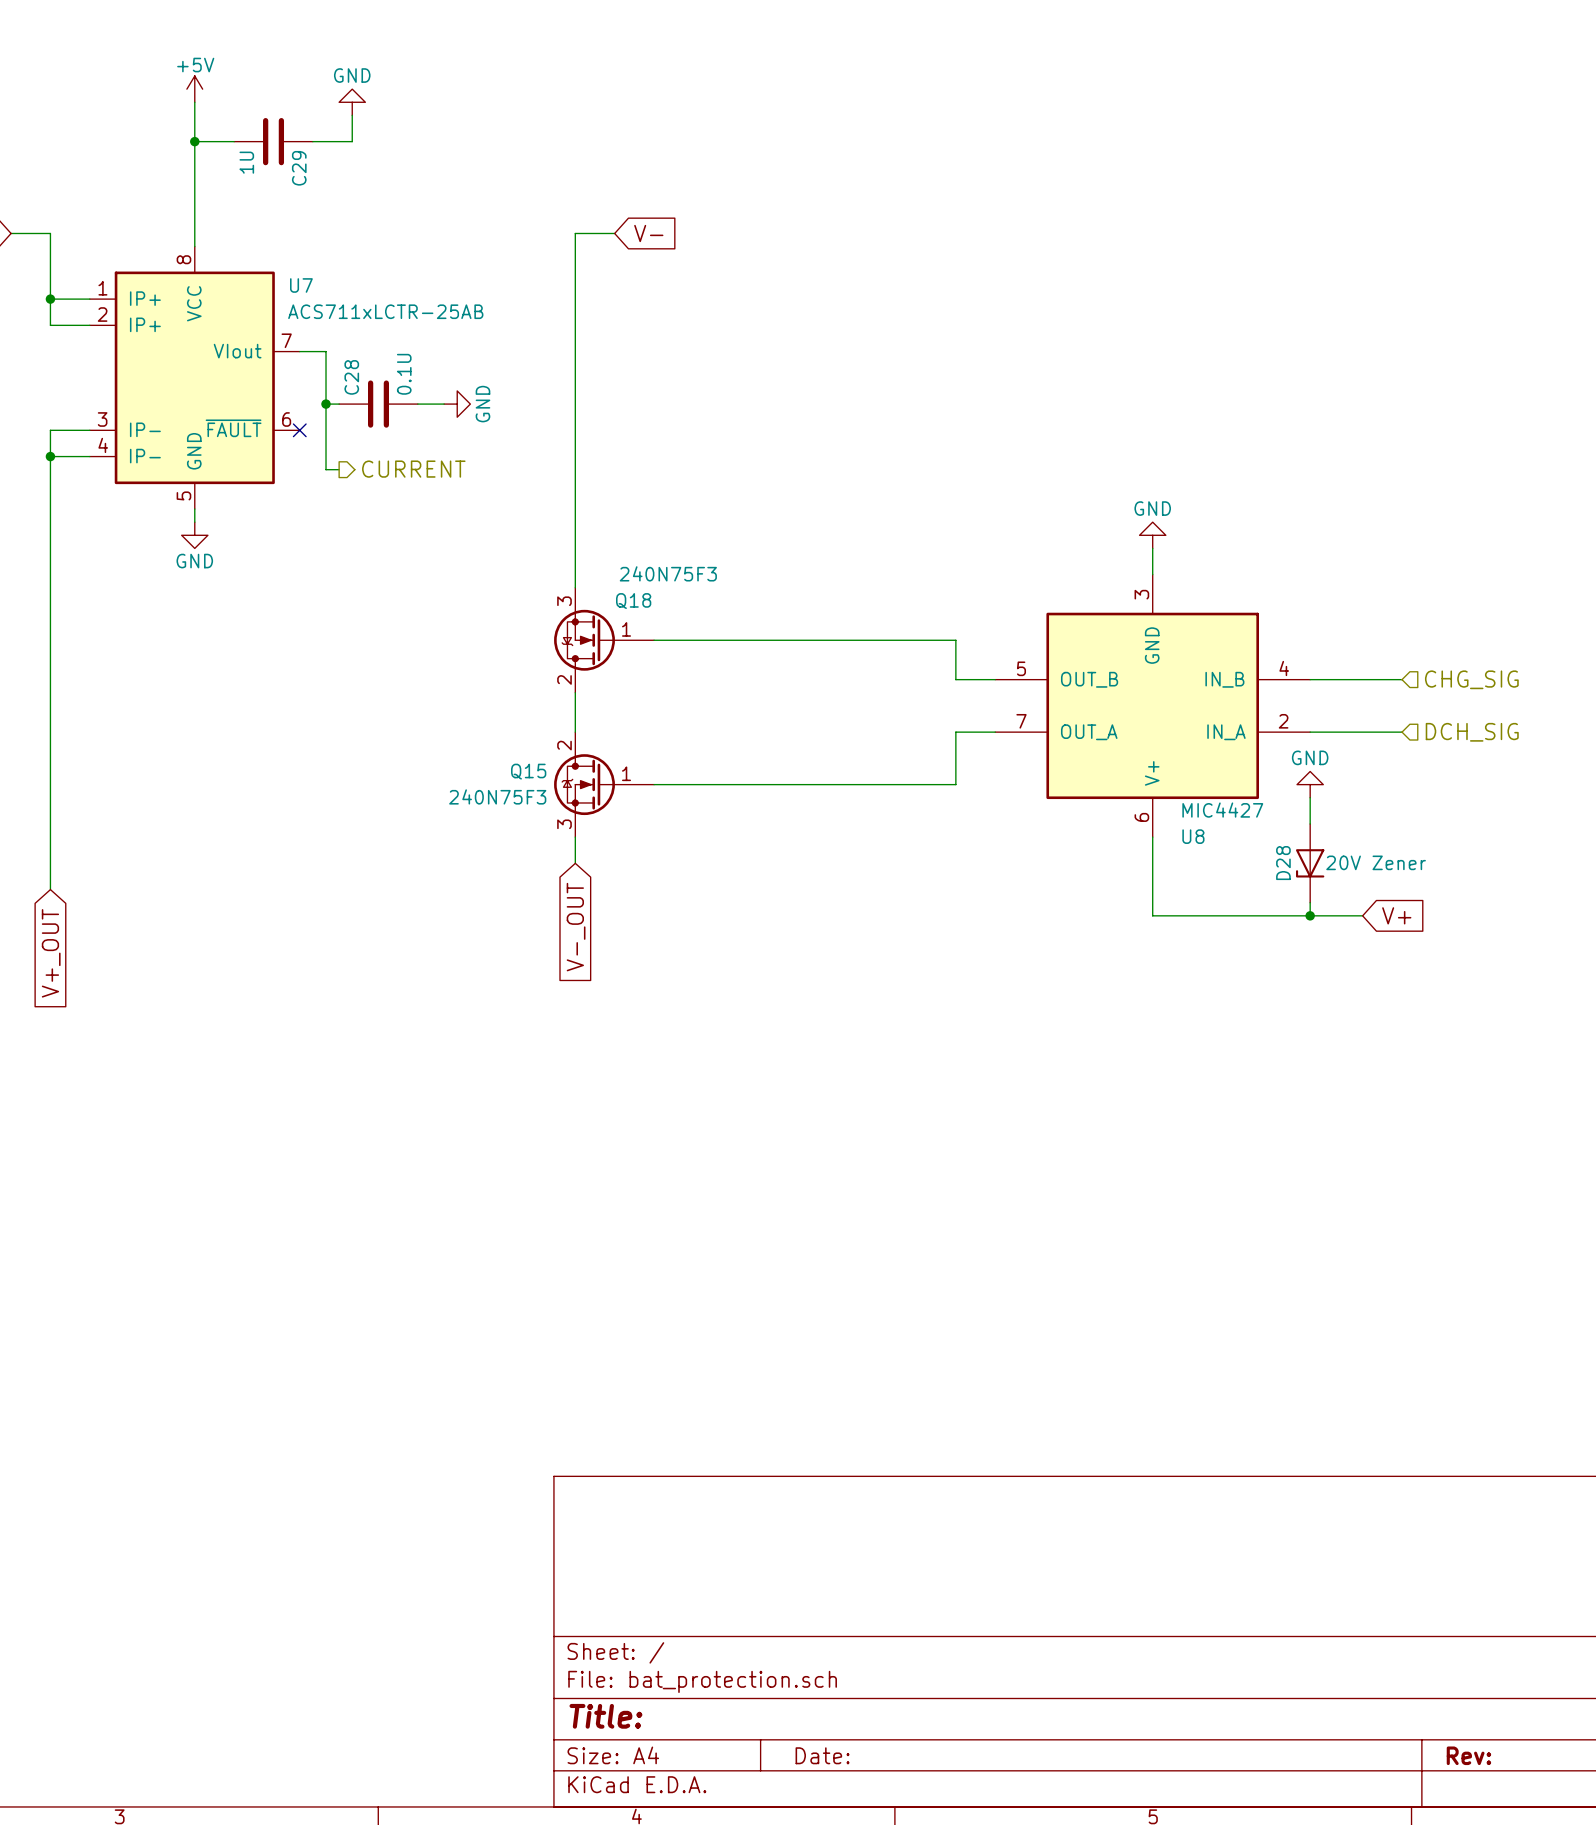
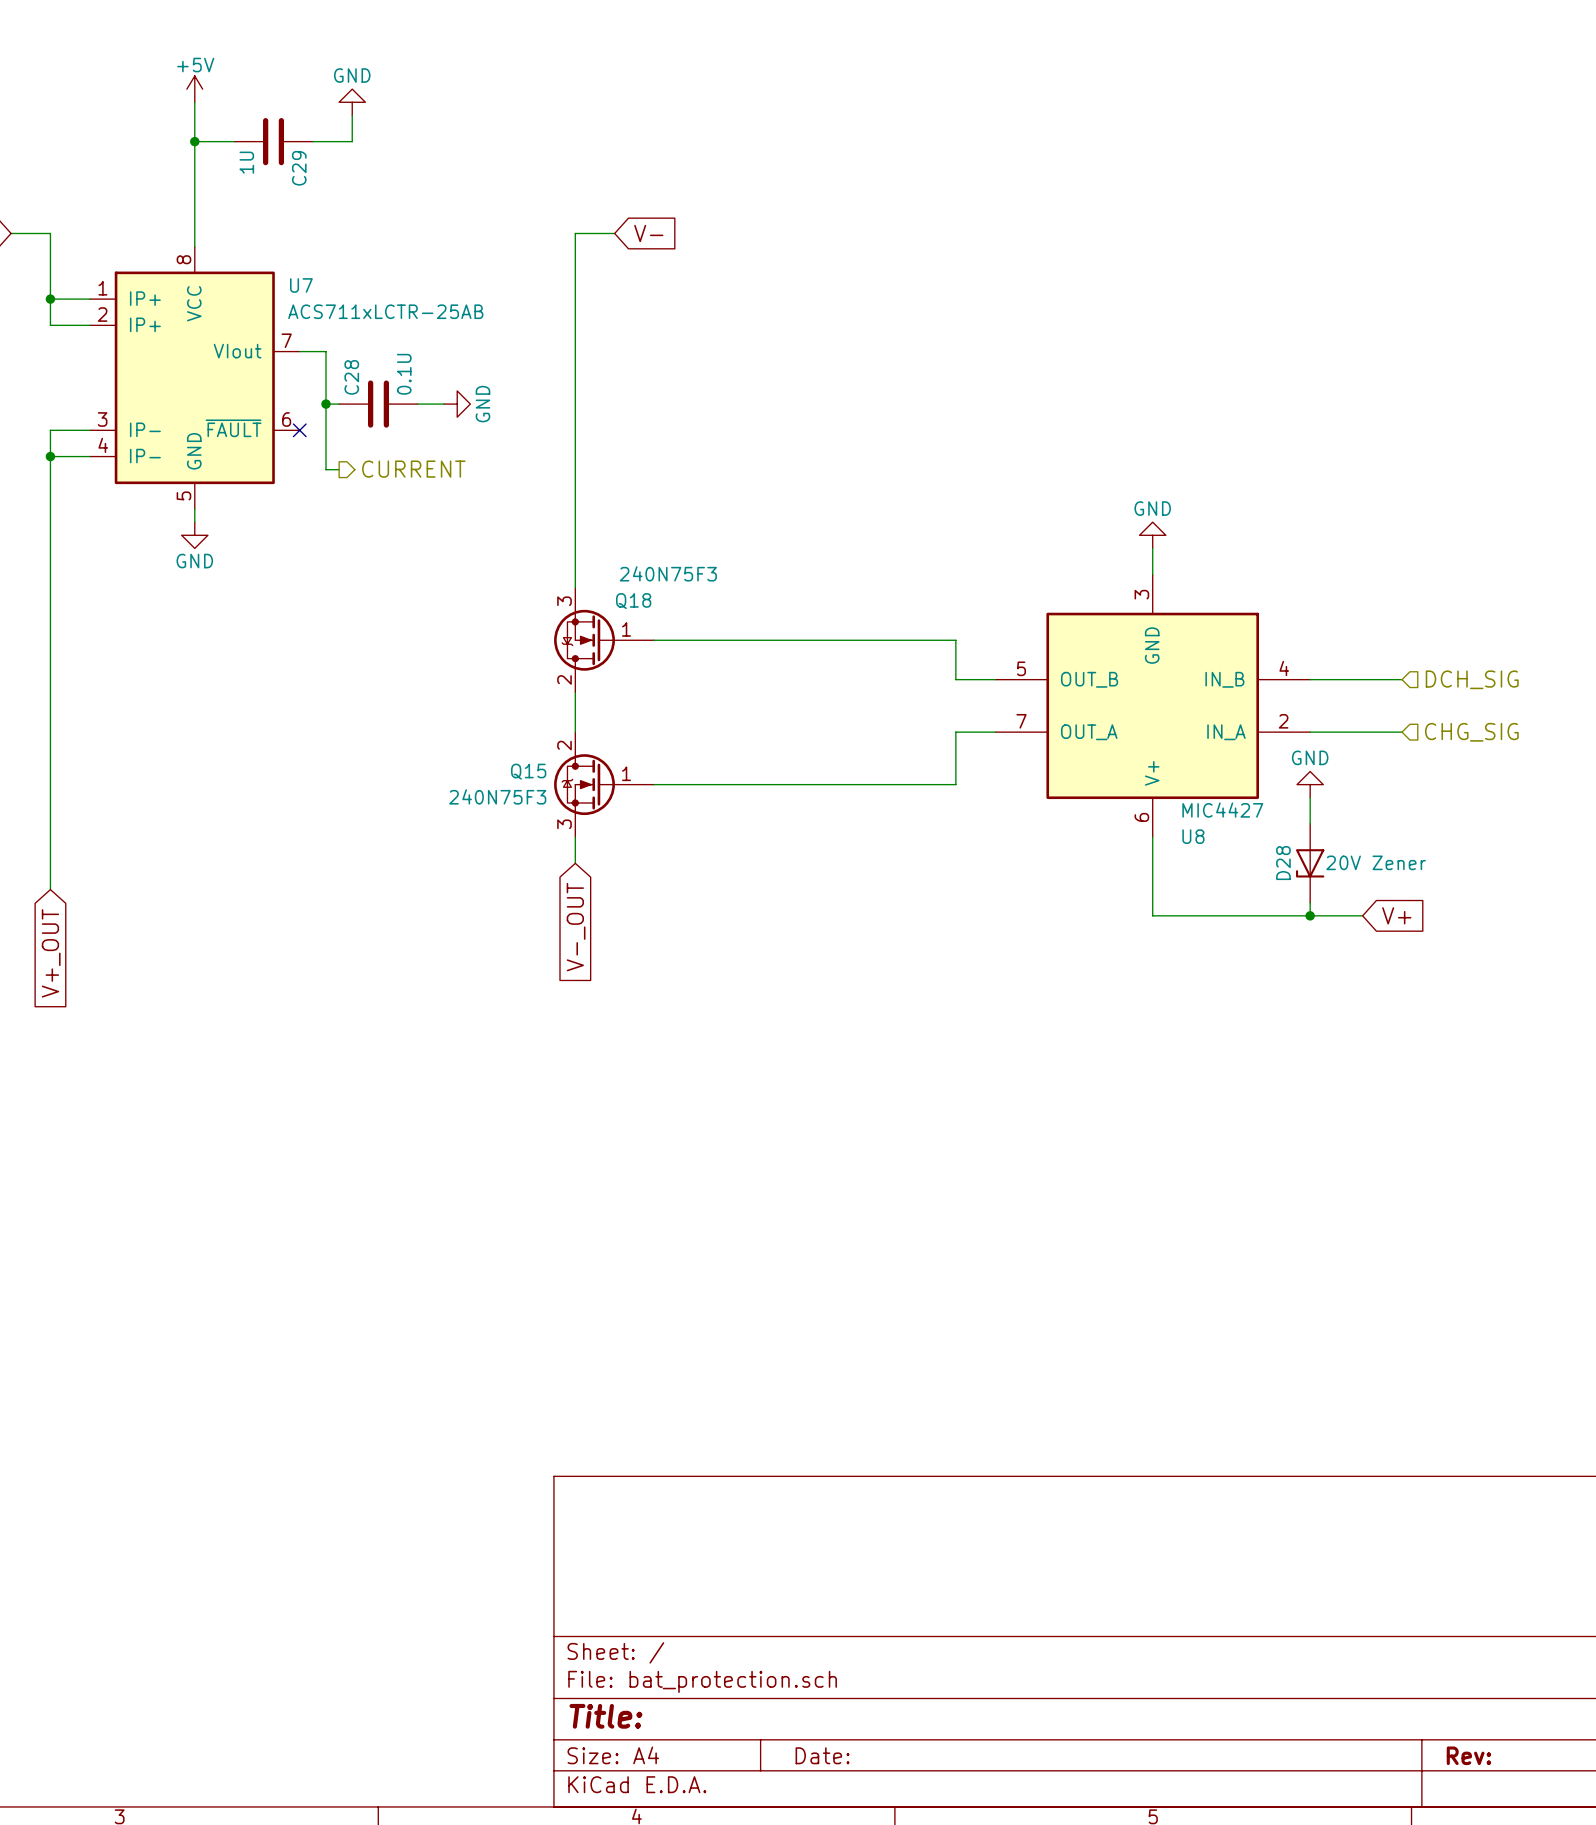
hierarchical label: CHG_SIG (1471, 679) -> DCH_SIG (1472, 679)
hierarchical label: DCH_SIG (1472, 732) -> CHG_SIG (1471, 732)

